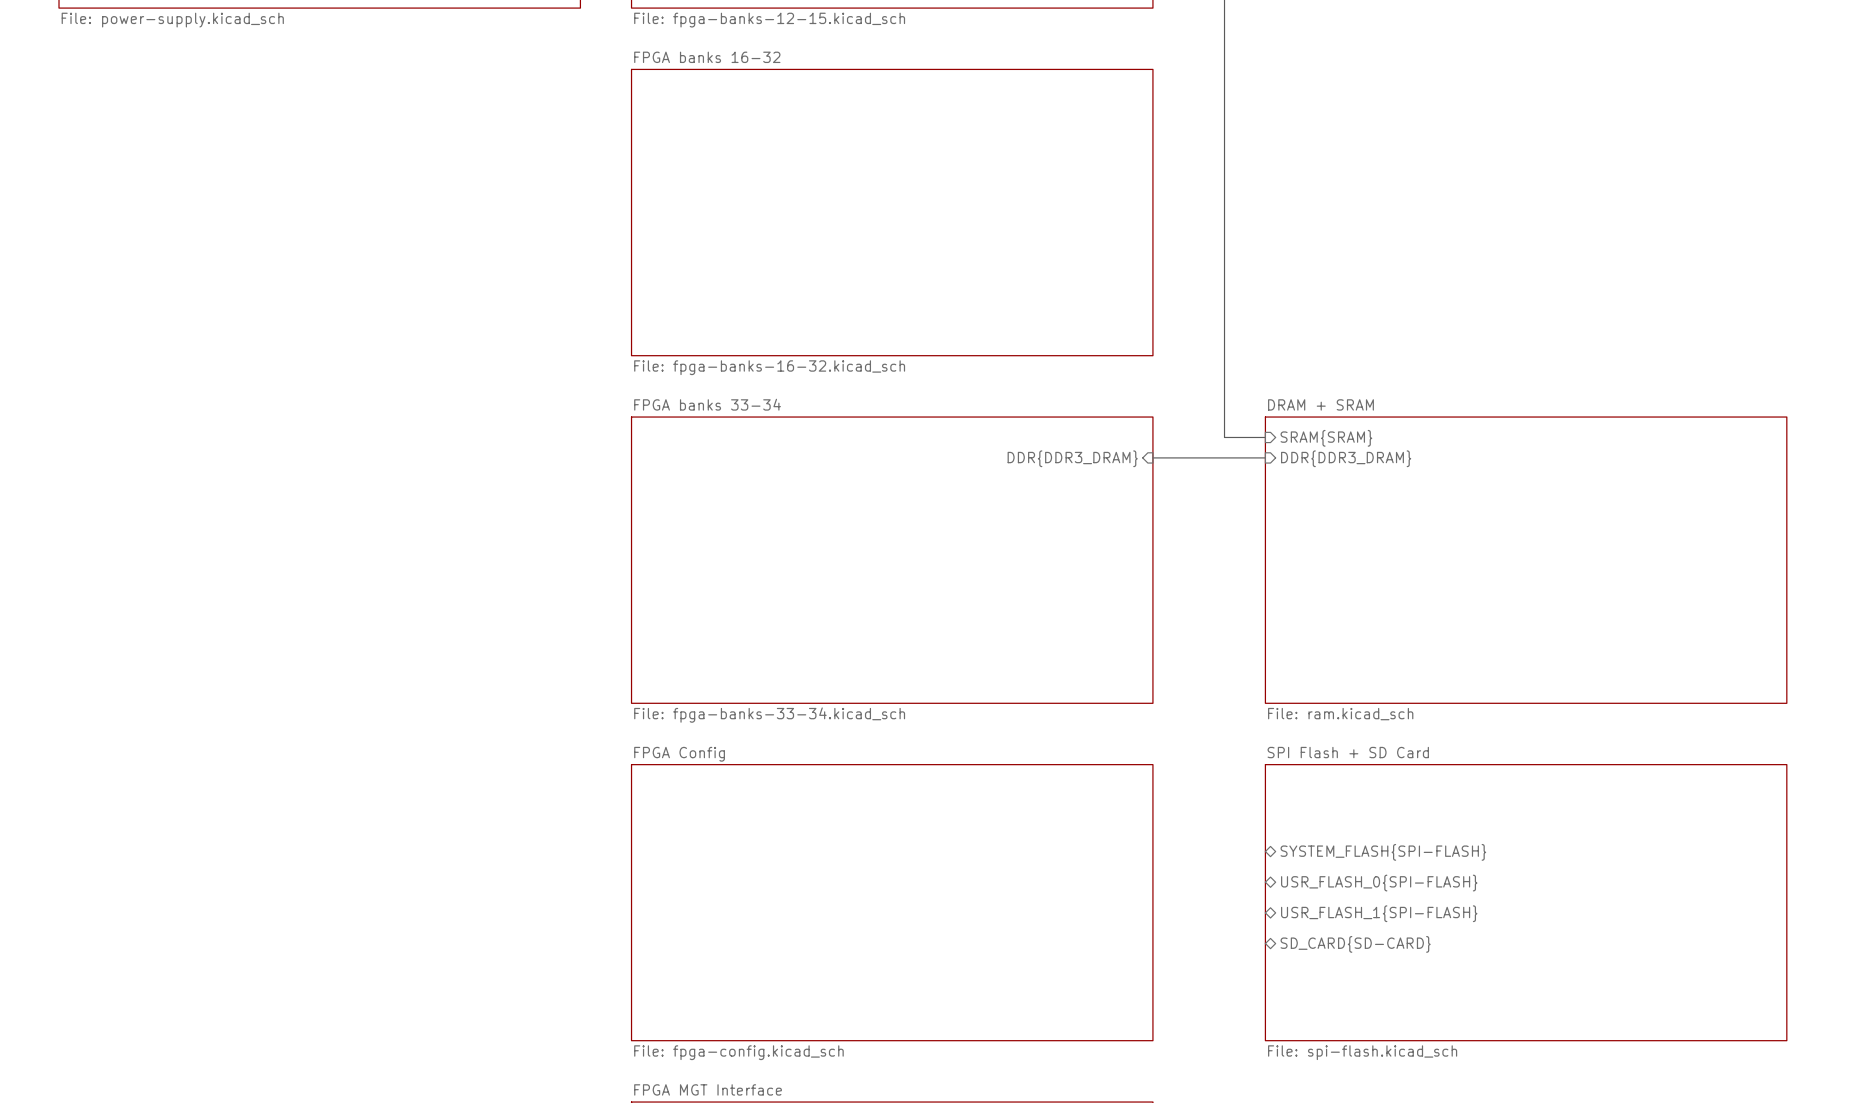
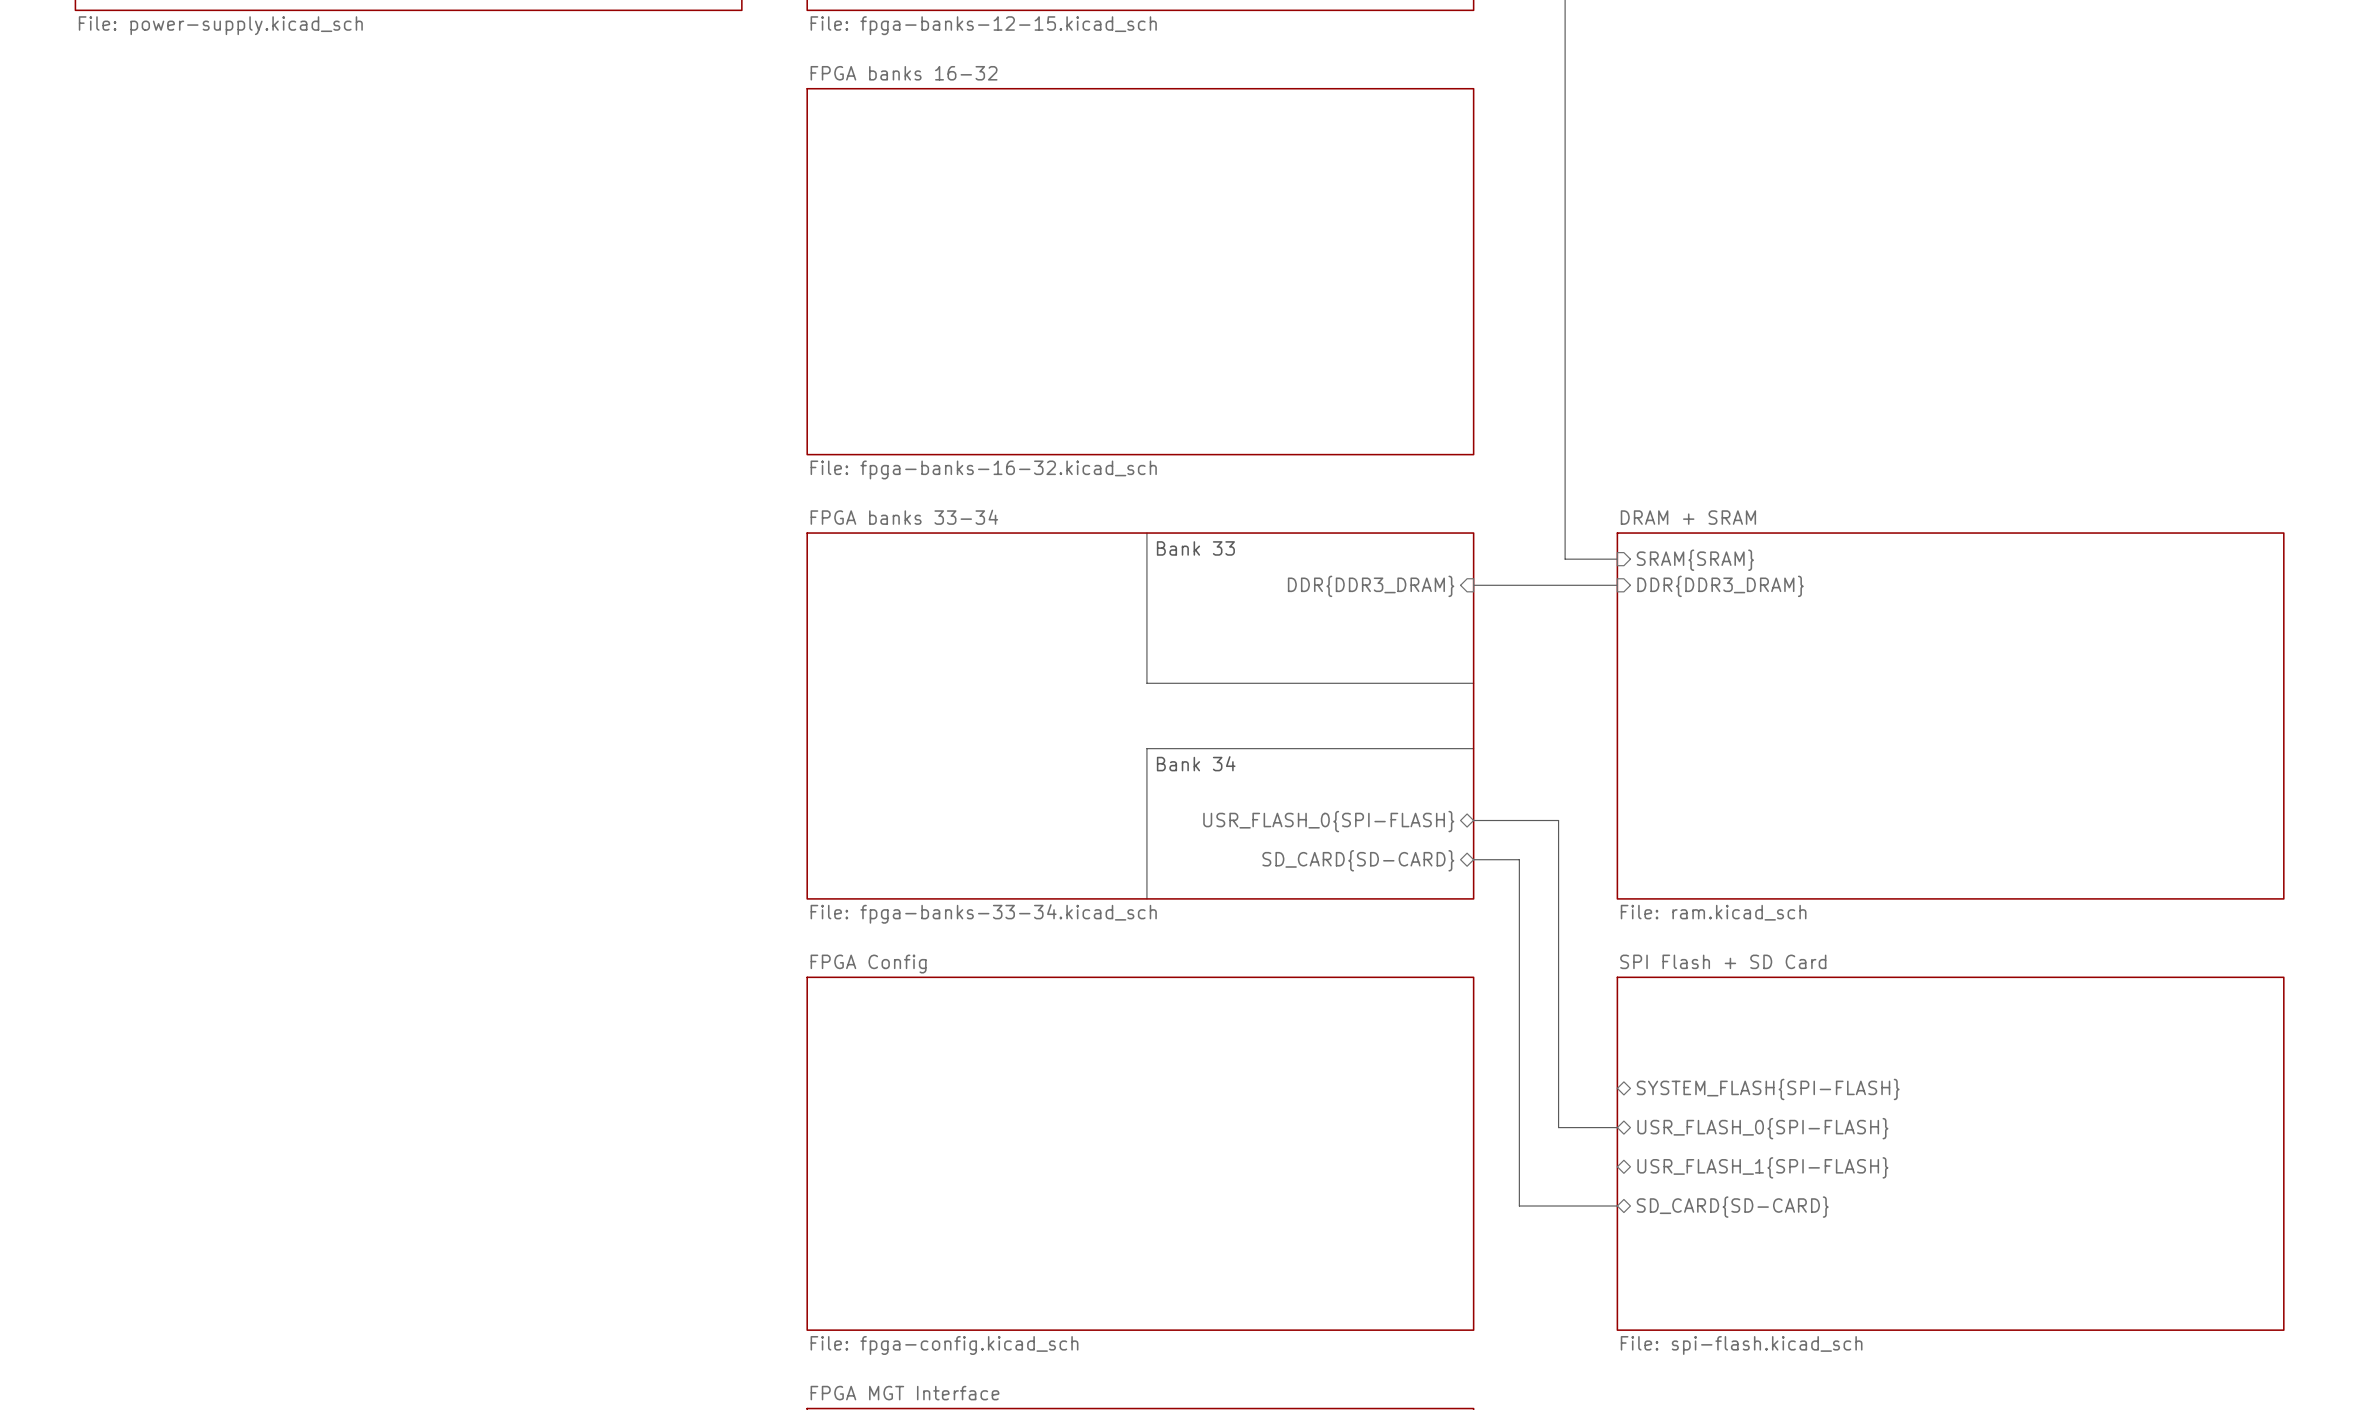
line: none -> (1146, 533) (1146, 683) (1473, 683)
text: none -> Bank 33 (1195, 548)
line: none -> (1473, 748) (1146, 748) (1146, 898)
text: none -> Bank 34 (1196, 763)
bus: none -> (1473, 820) (1558, 820) (1558, 1127) (1617, 1127)
sheet pin: none -> USR_FLASH_0{SPI-FLASH} (1328, 821)
bus: none -> (1473, 859) (1519, 859) (1519, 1206) (1617, 1206)
sheet pin: none -> SD_CARD{SD-CARD} (1358, 860)

